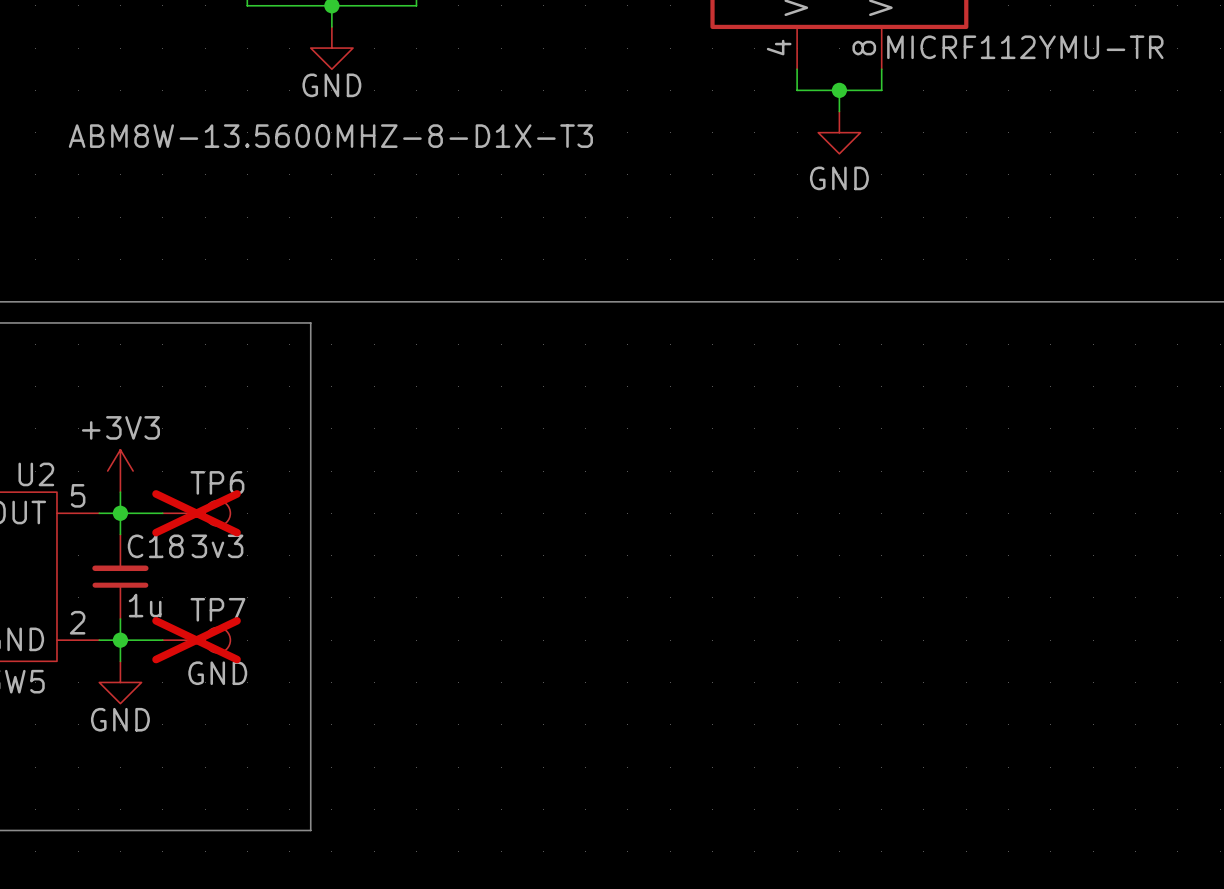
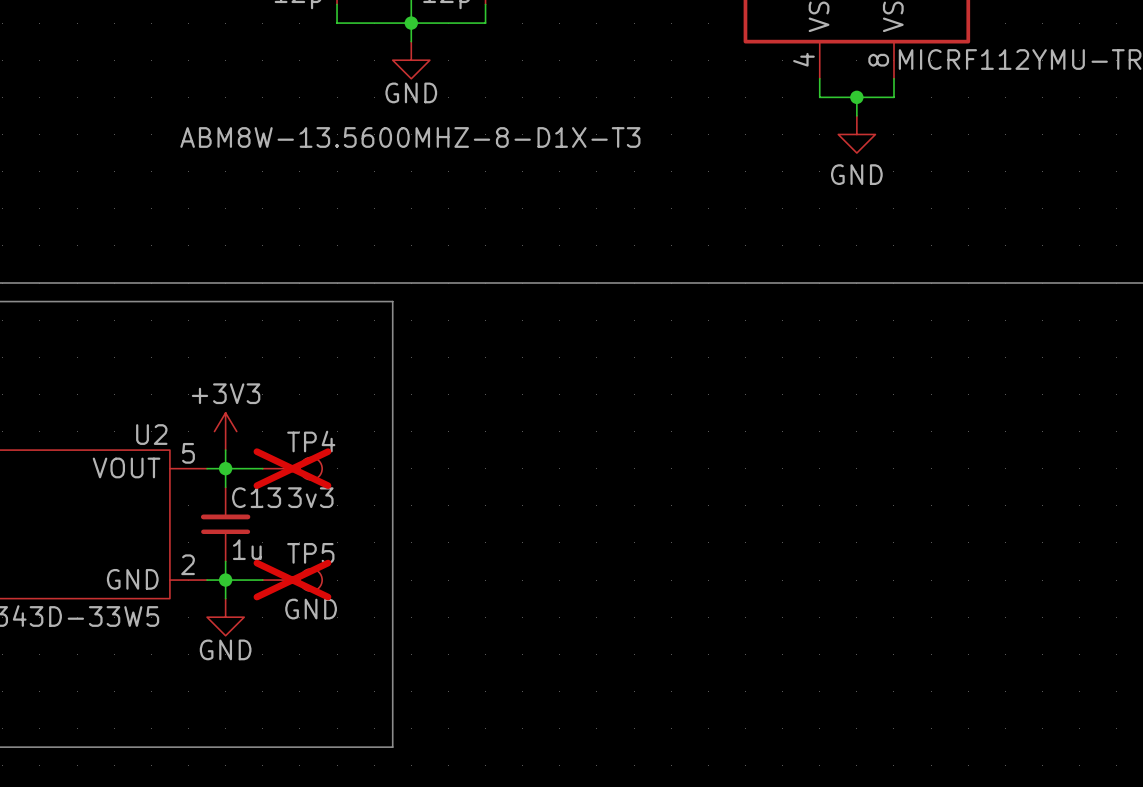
TP6 name: TP6 (217, 482) -> TP4 (311, 441)
C18 name: C18 (155, 546) -> C13 (256, 497)
TP7 name: TP7 (217, 609) -> TP5 (310, 553)

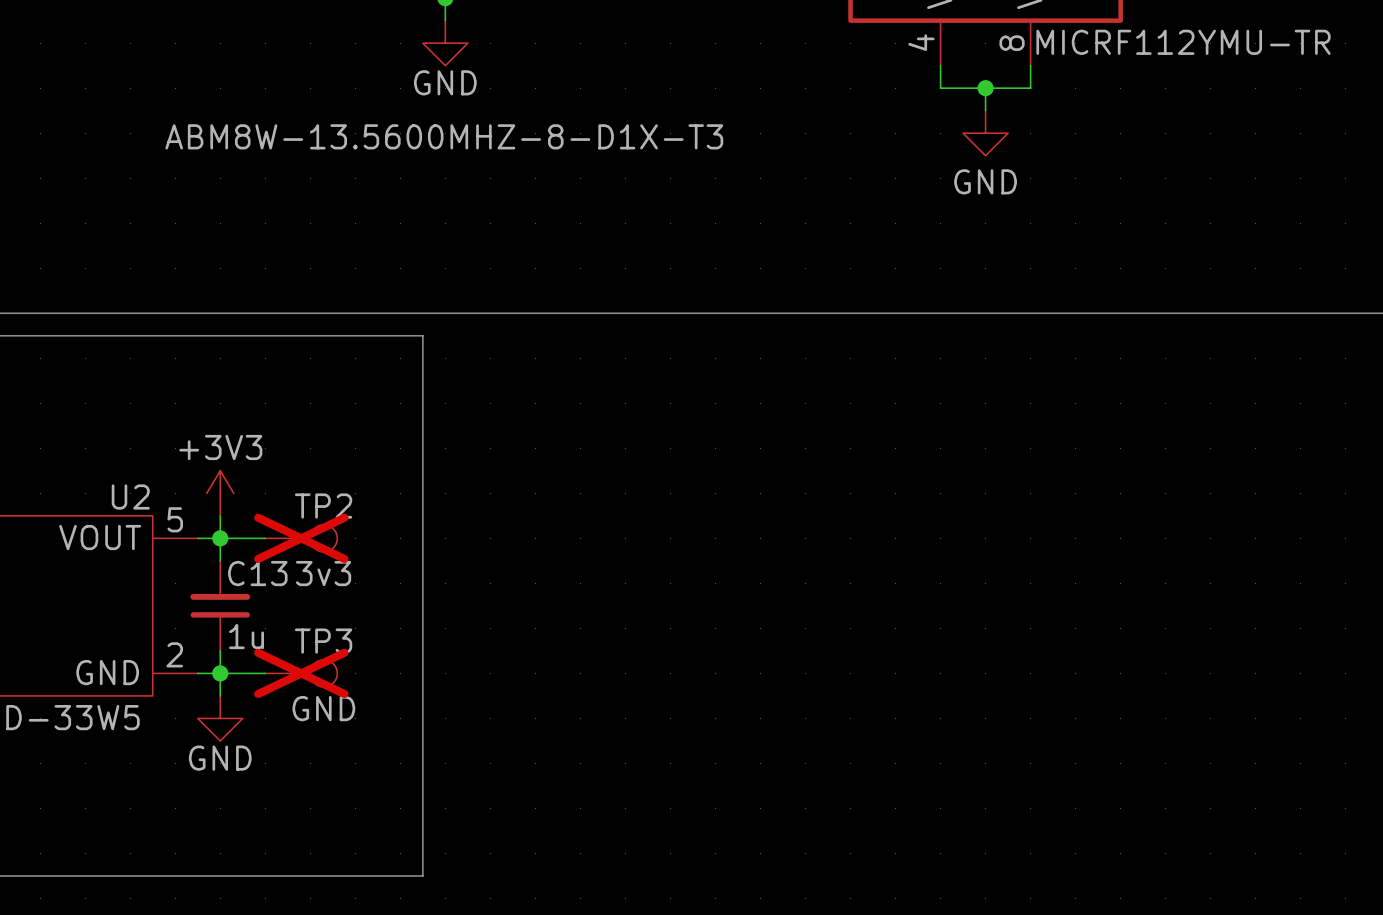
TP4 name: TP4 (311, 441) -> TP2 (323, 506)
TP5 name: TP5 (310, 553) -> TP3 (323, 641)

